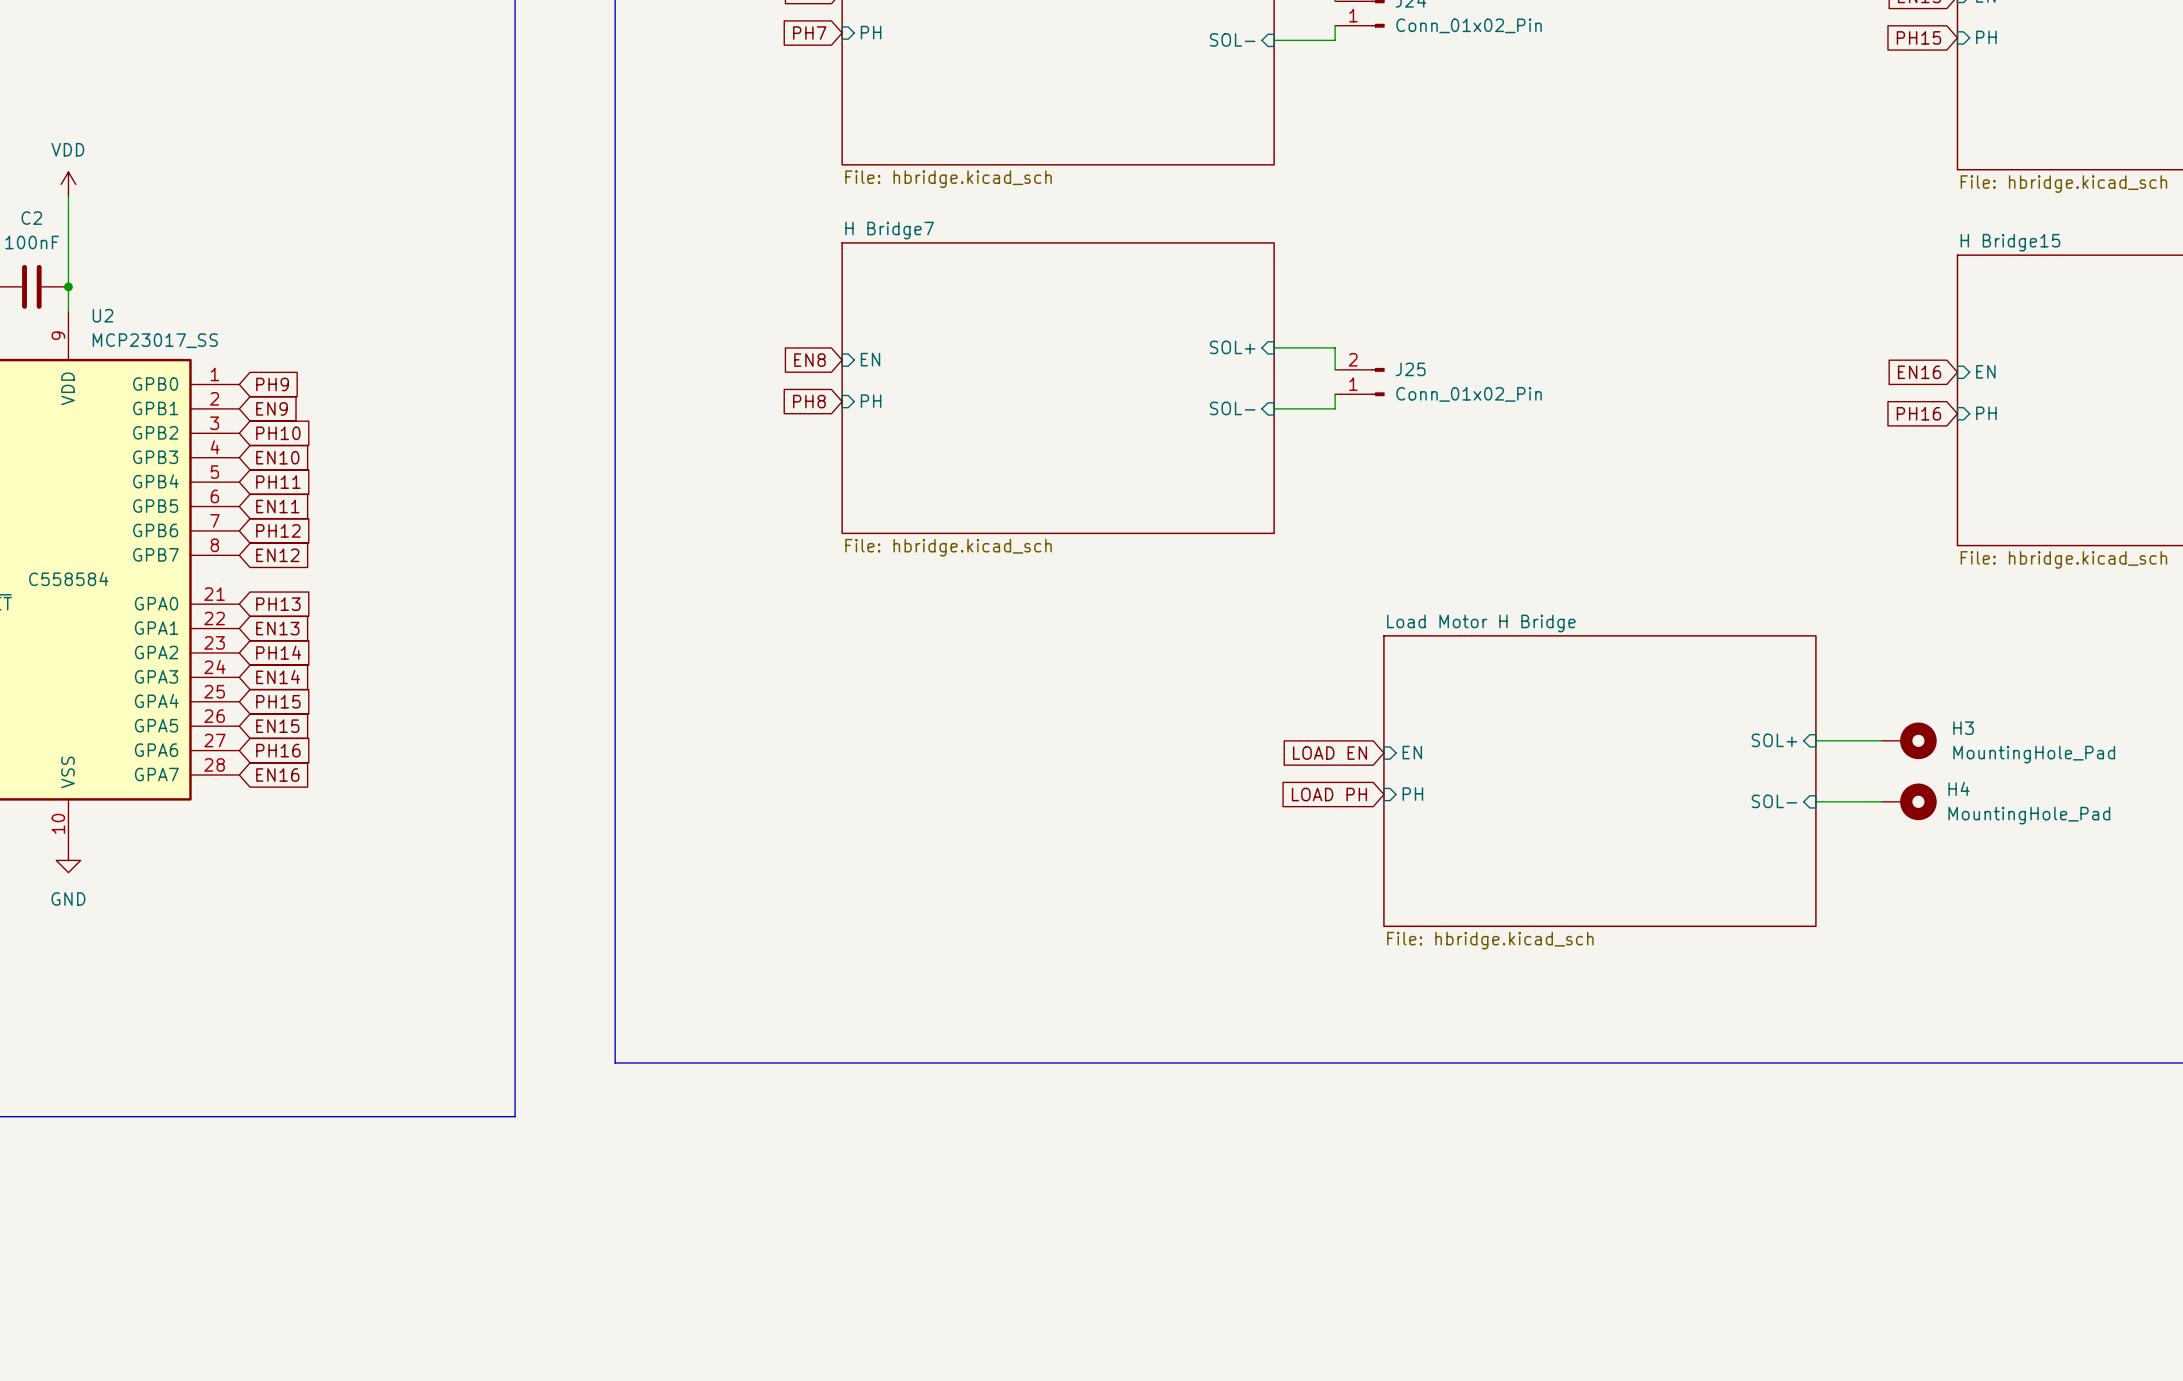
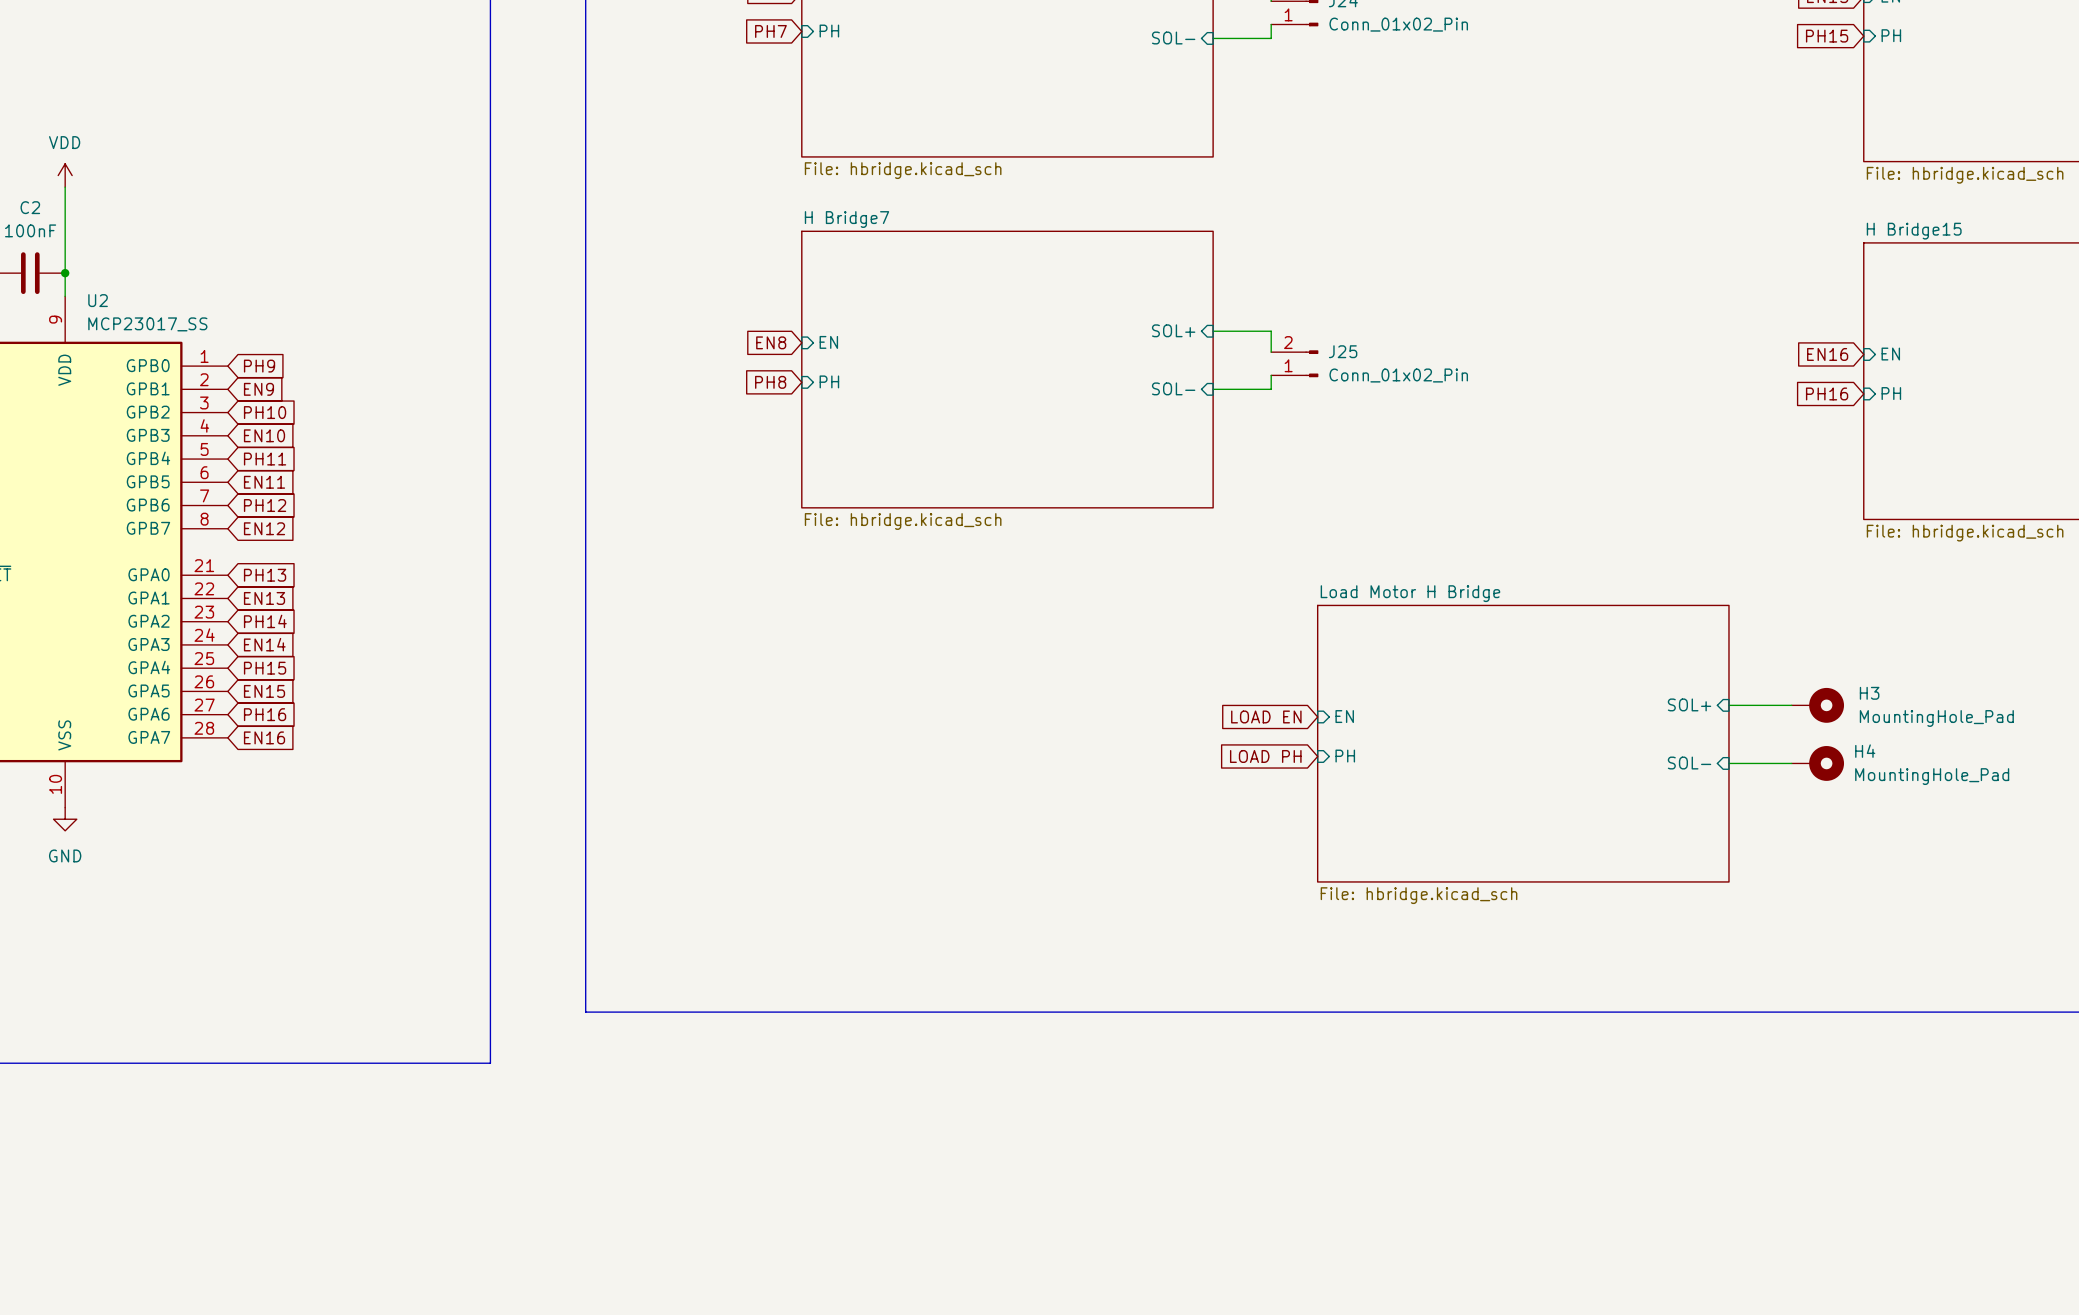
U2 text: C558584 (68, 579) -> none

